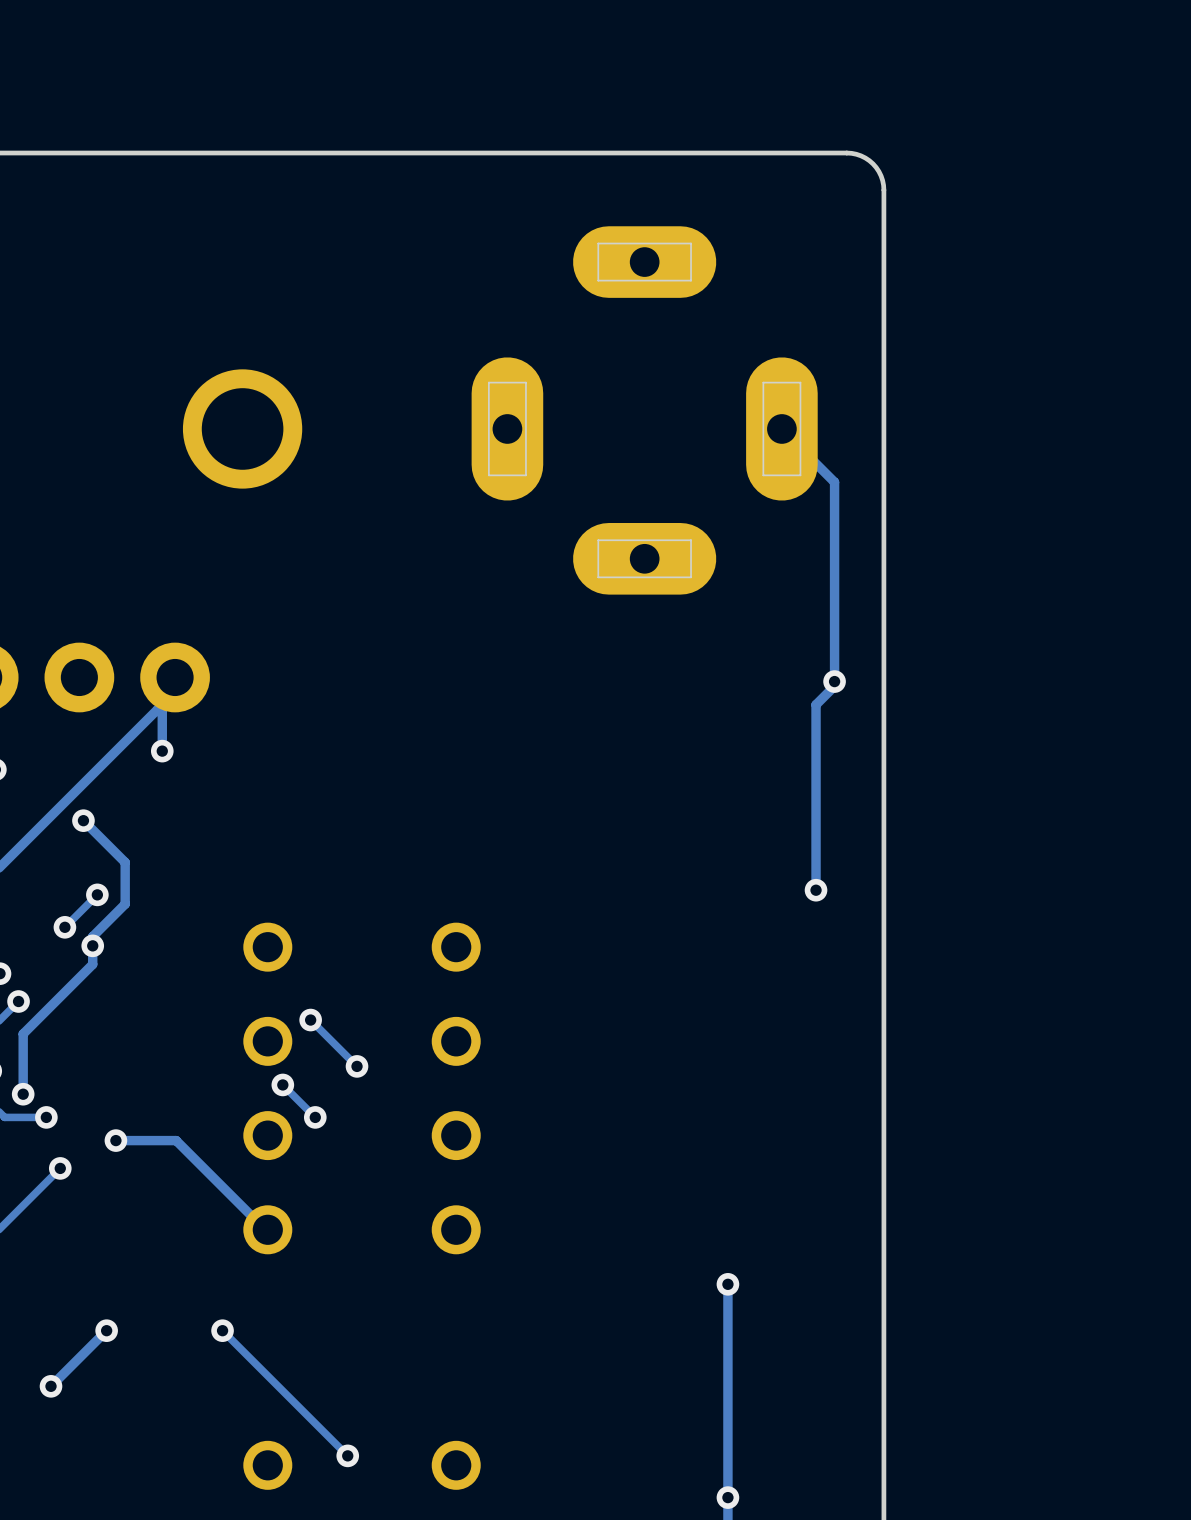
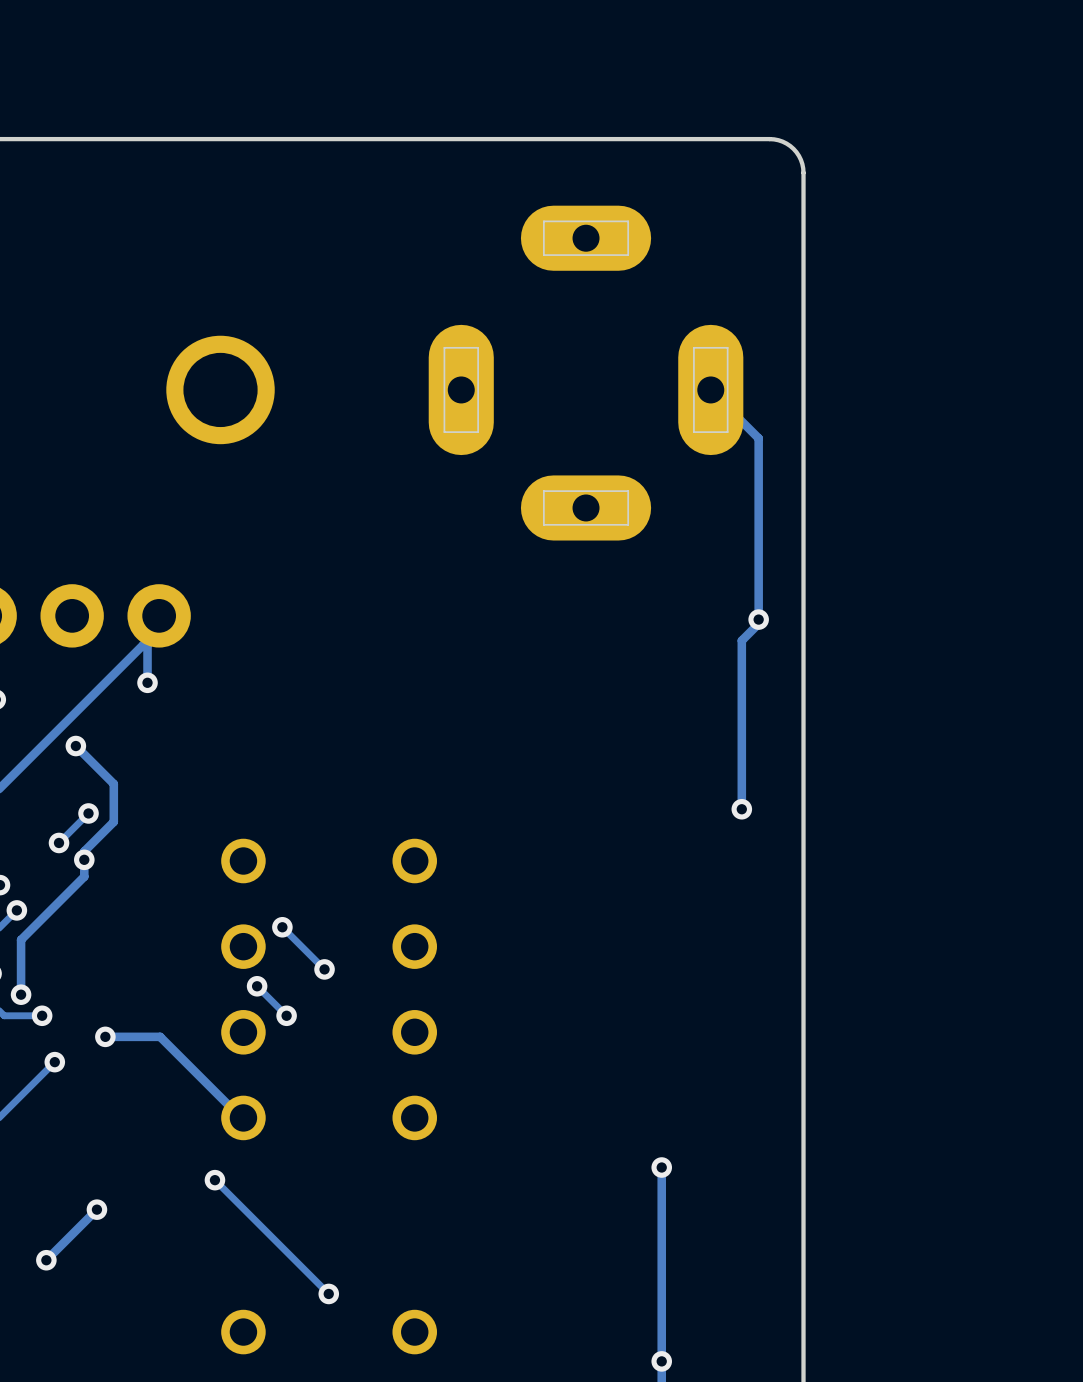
track: (222, 1330) (347, 1455) -> (214, 1180) (328, 1293)
via position: (222, 1330) -> (214, 1180)
via position: (347, 1455) -> (328, 1293)

